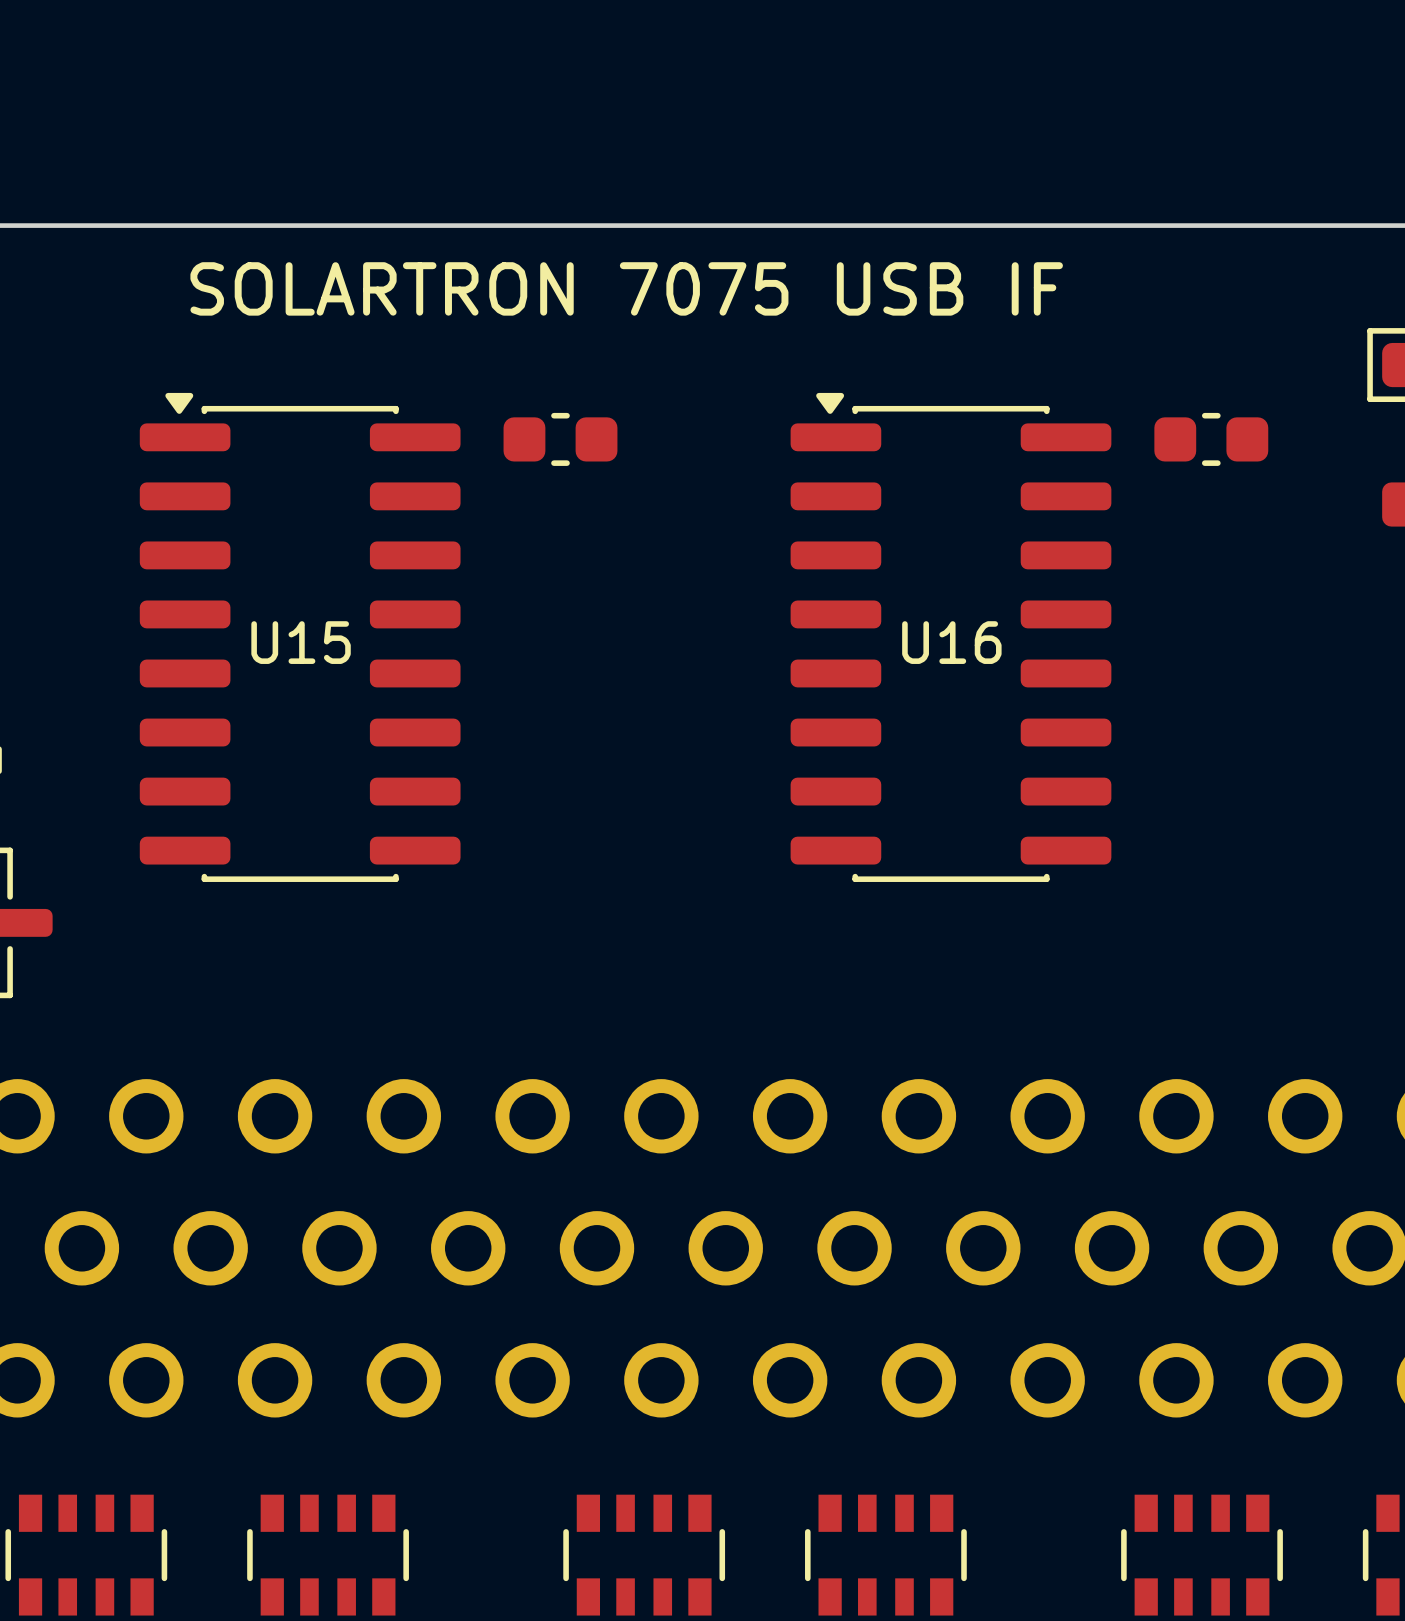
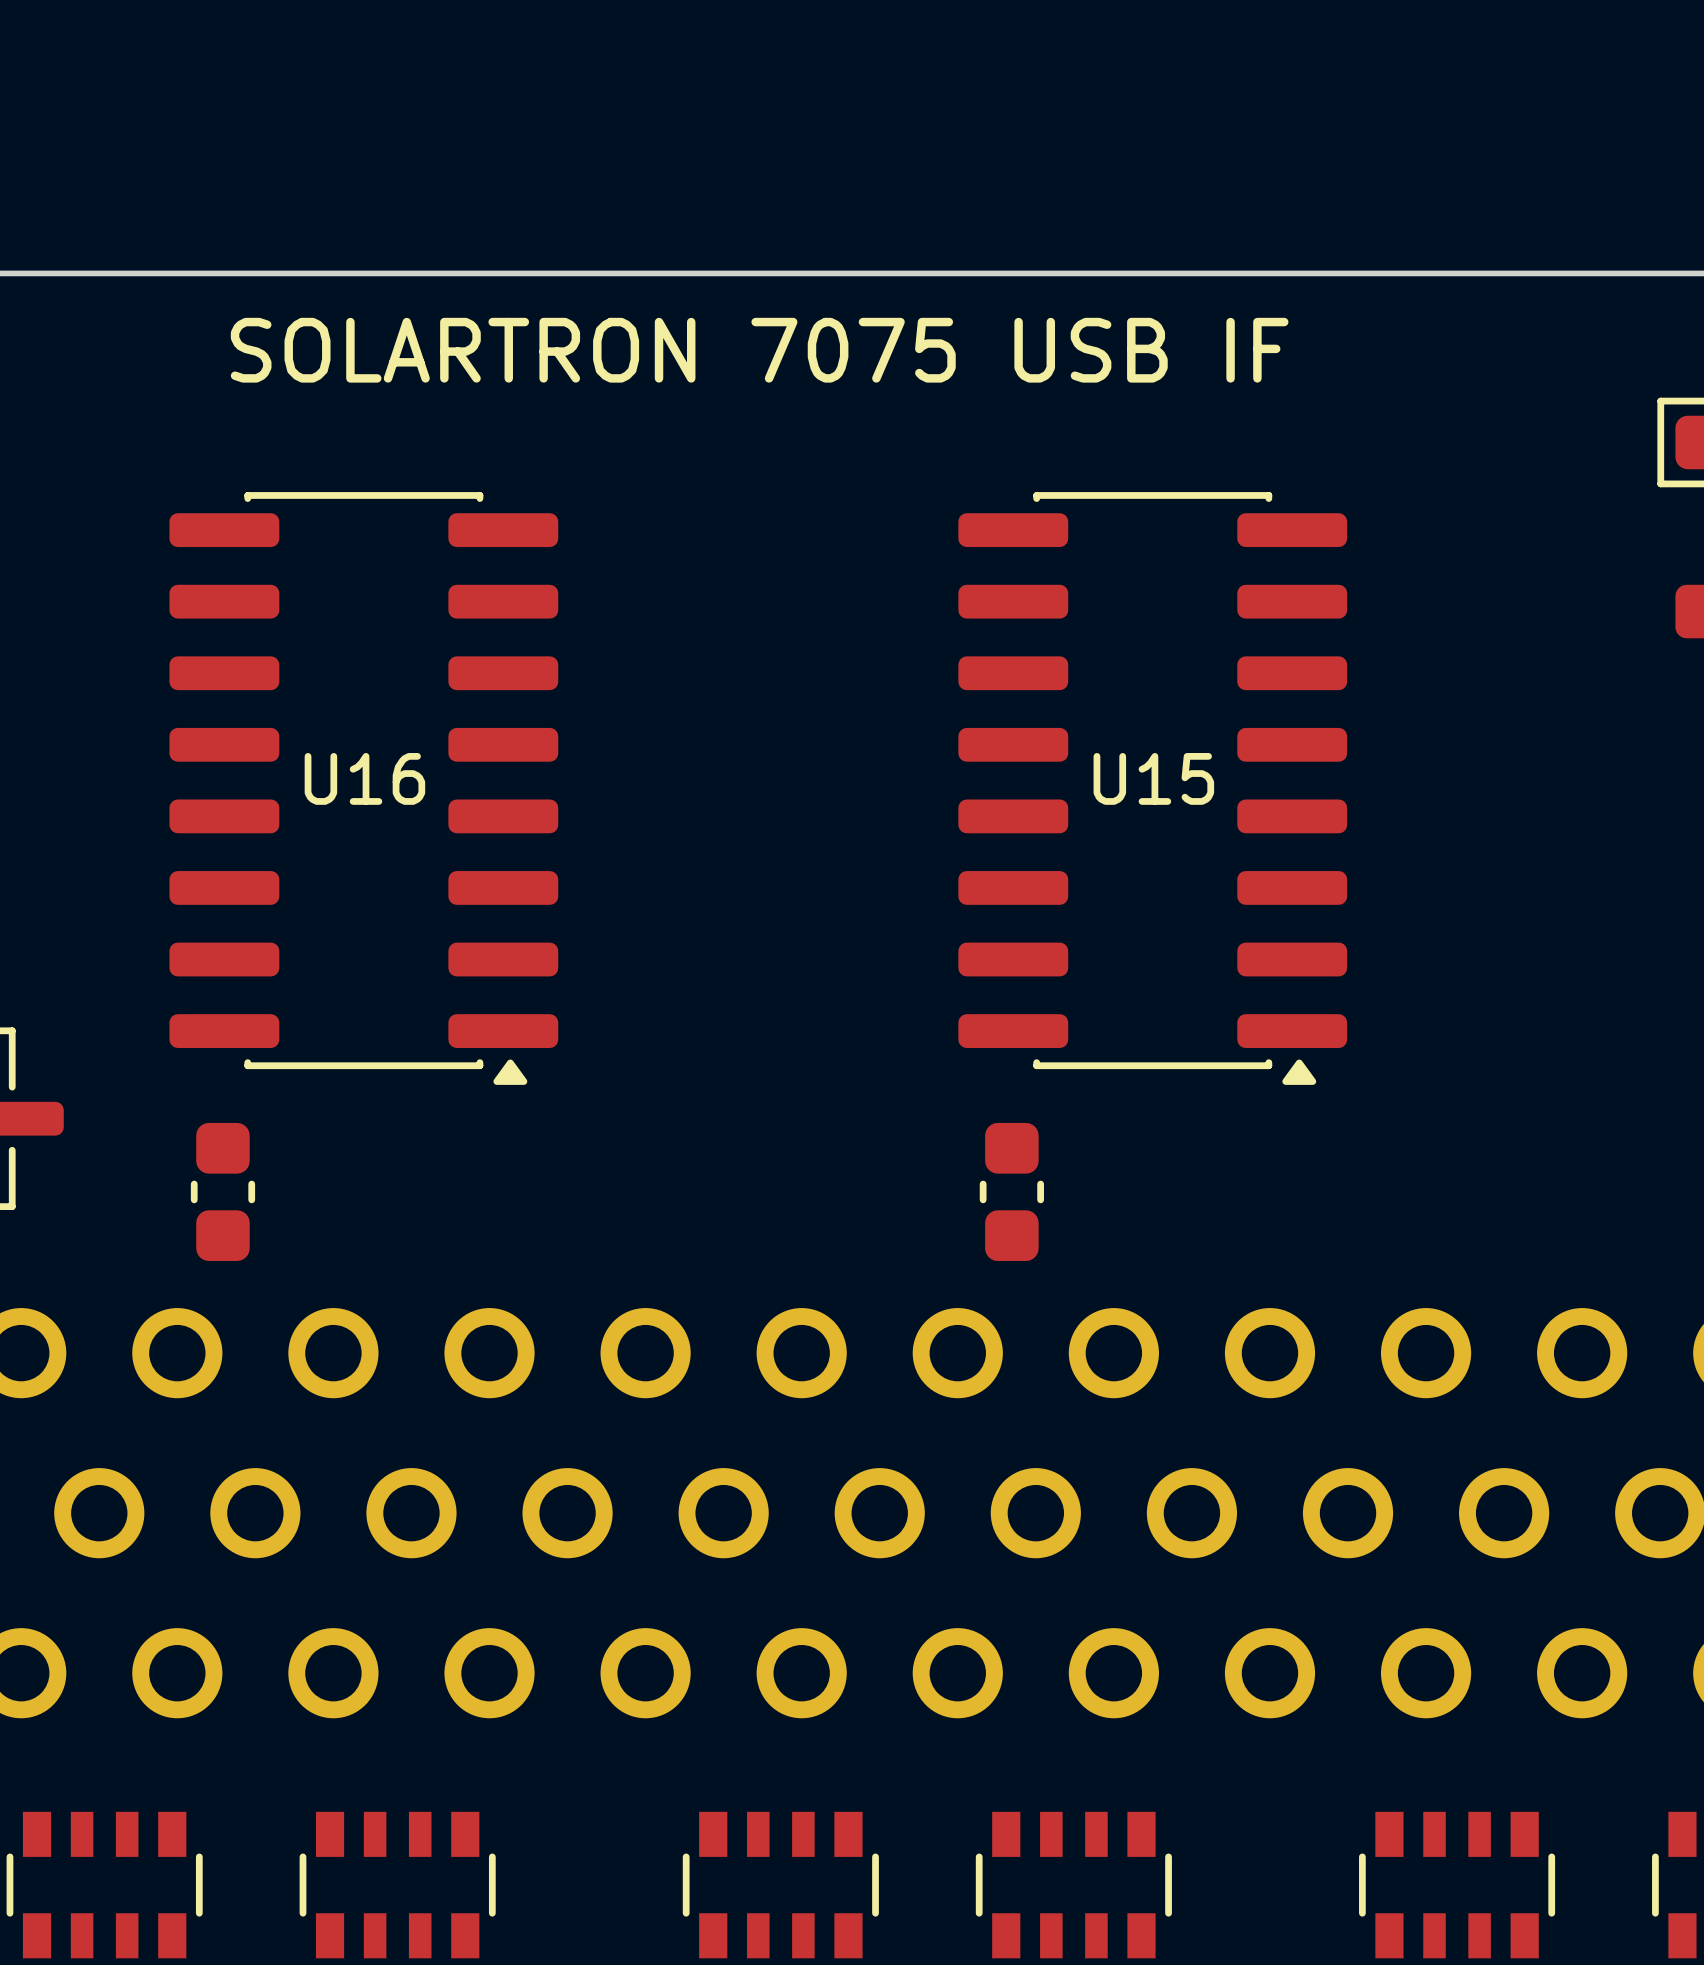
part: (560, 439) -> none
part: (1211, 439) -> none
U15 rotation: 0° (300, 637) -> 180° (1152, 788)
U15 position: (300, 637) -> (1152, 788)
U16 rotation: 0° (950, 637) -> 180° (363, 788)
U16 position: (950, 637) -> (363, 788)
part: none -> (222, 1191)
part: none -> (1011, 1191)

